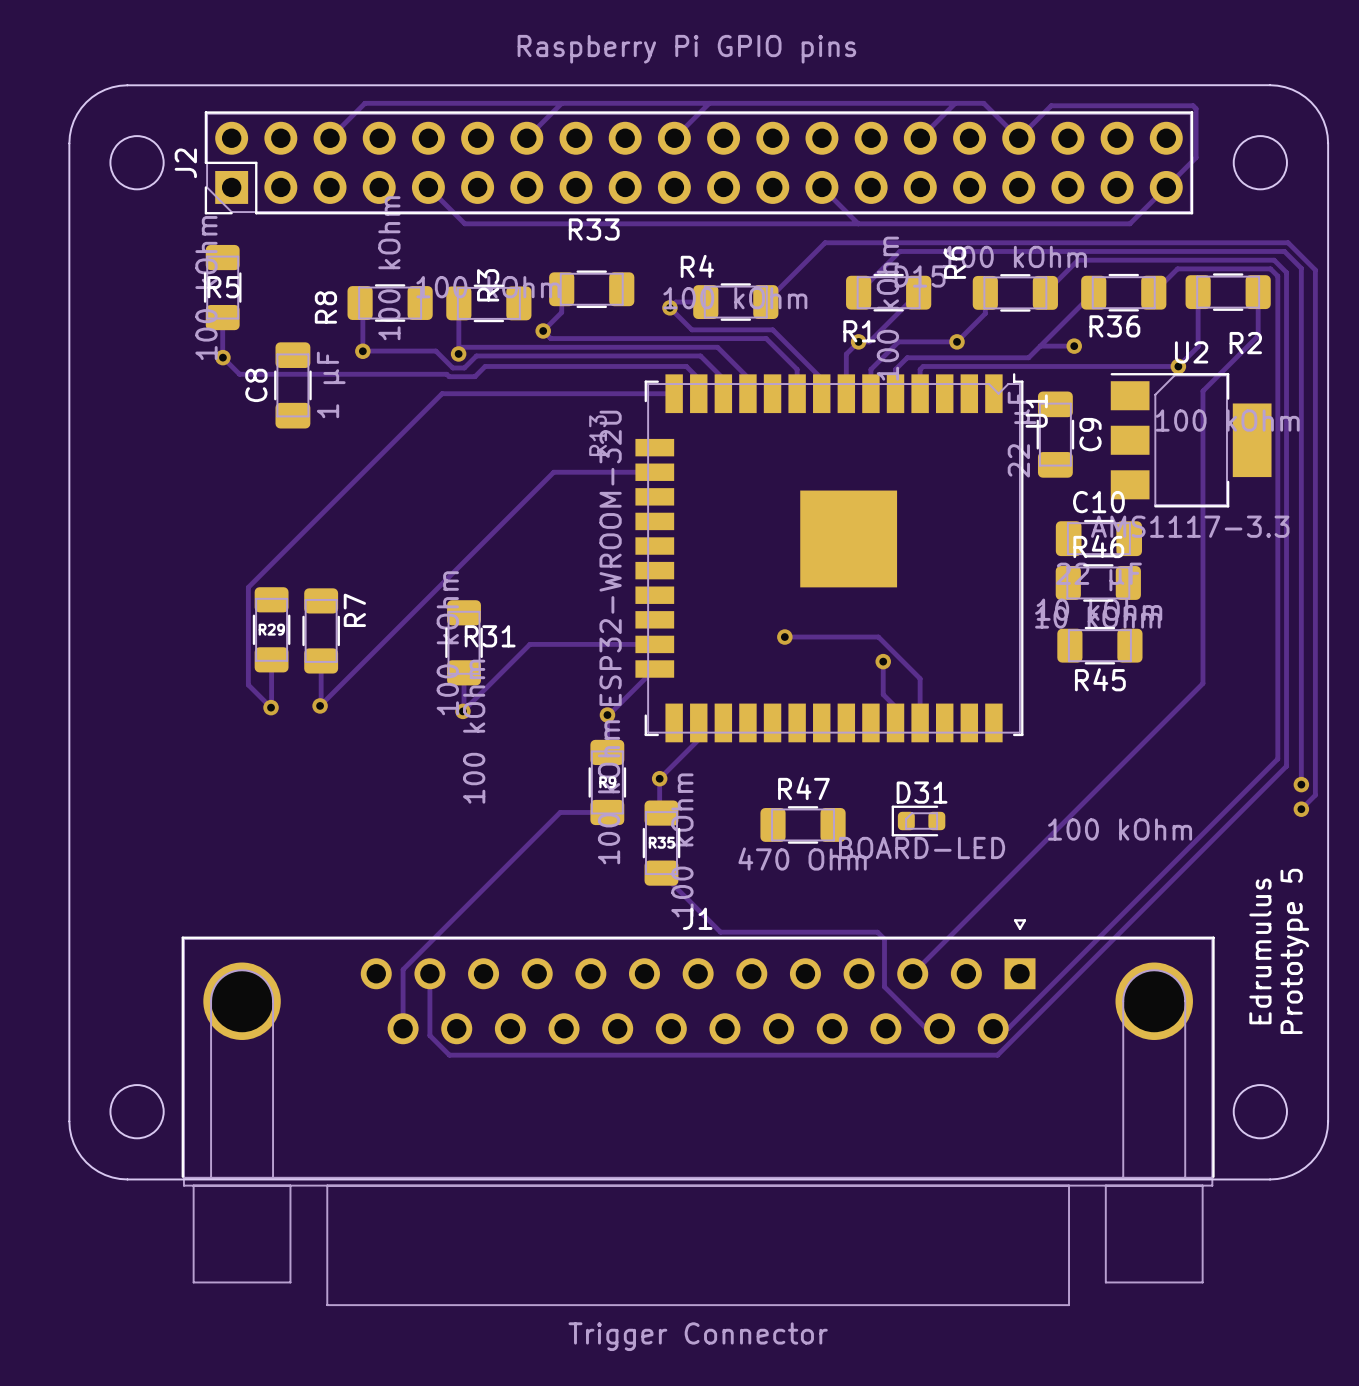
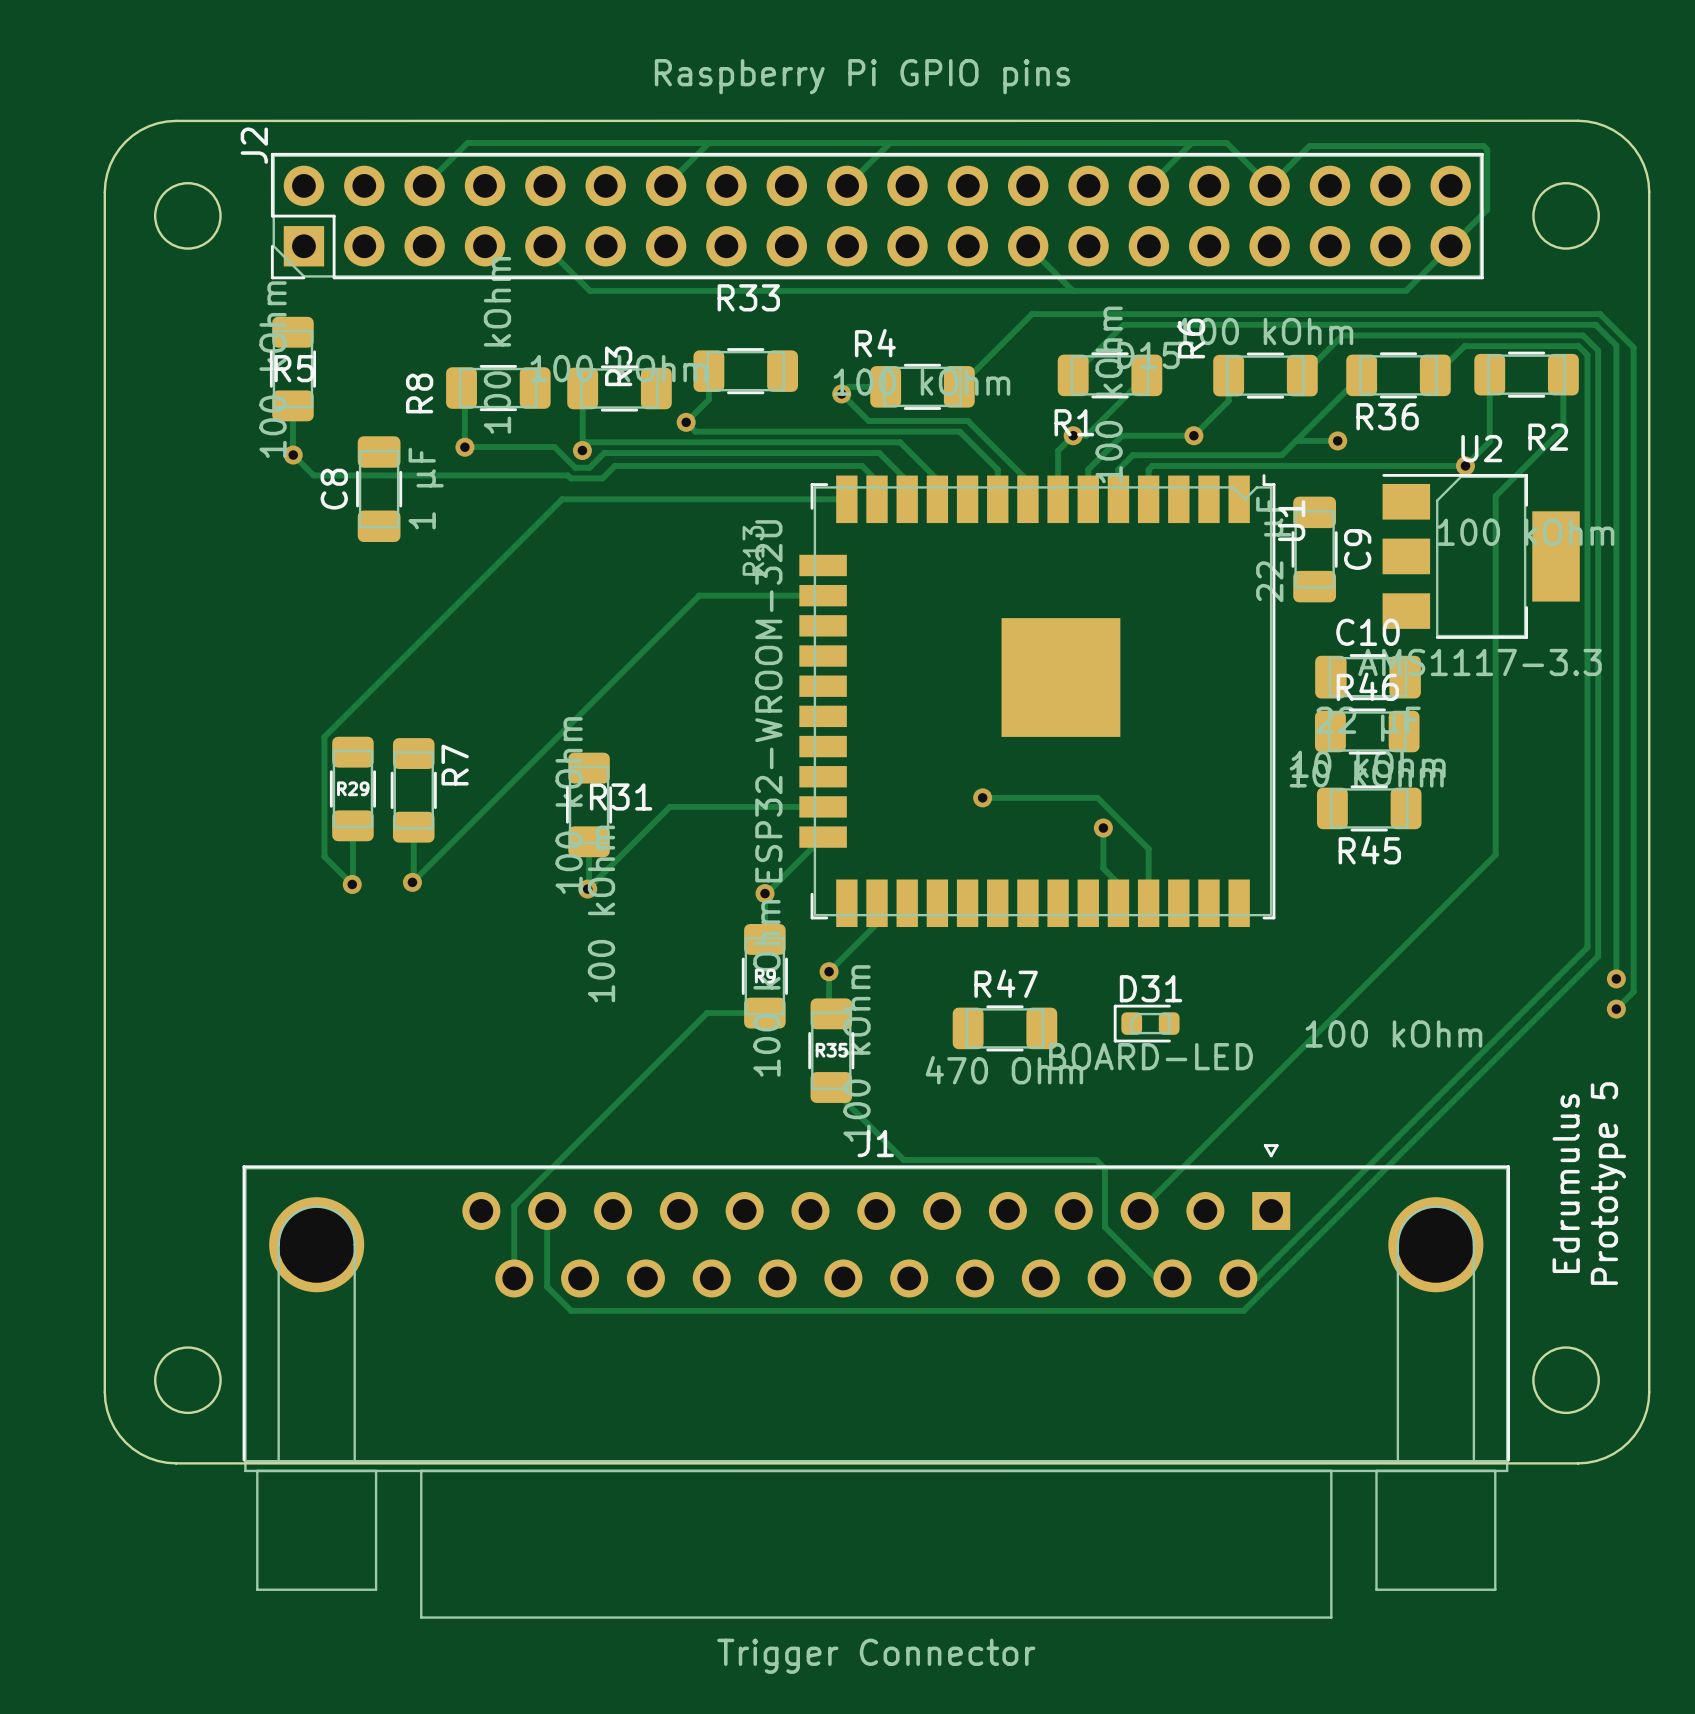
J2 name position: J2 (185, 163) -> J2 (254, 145)

